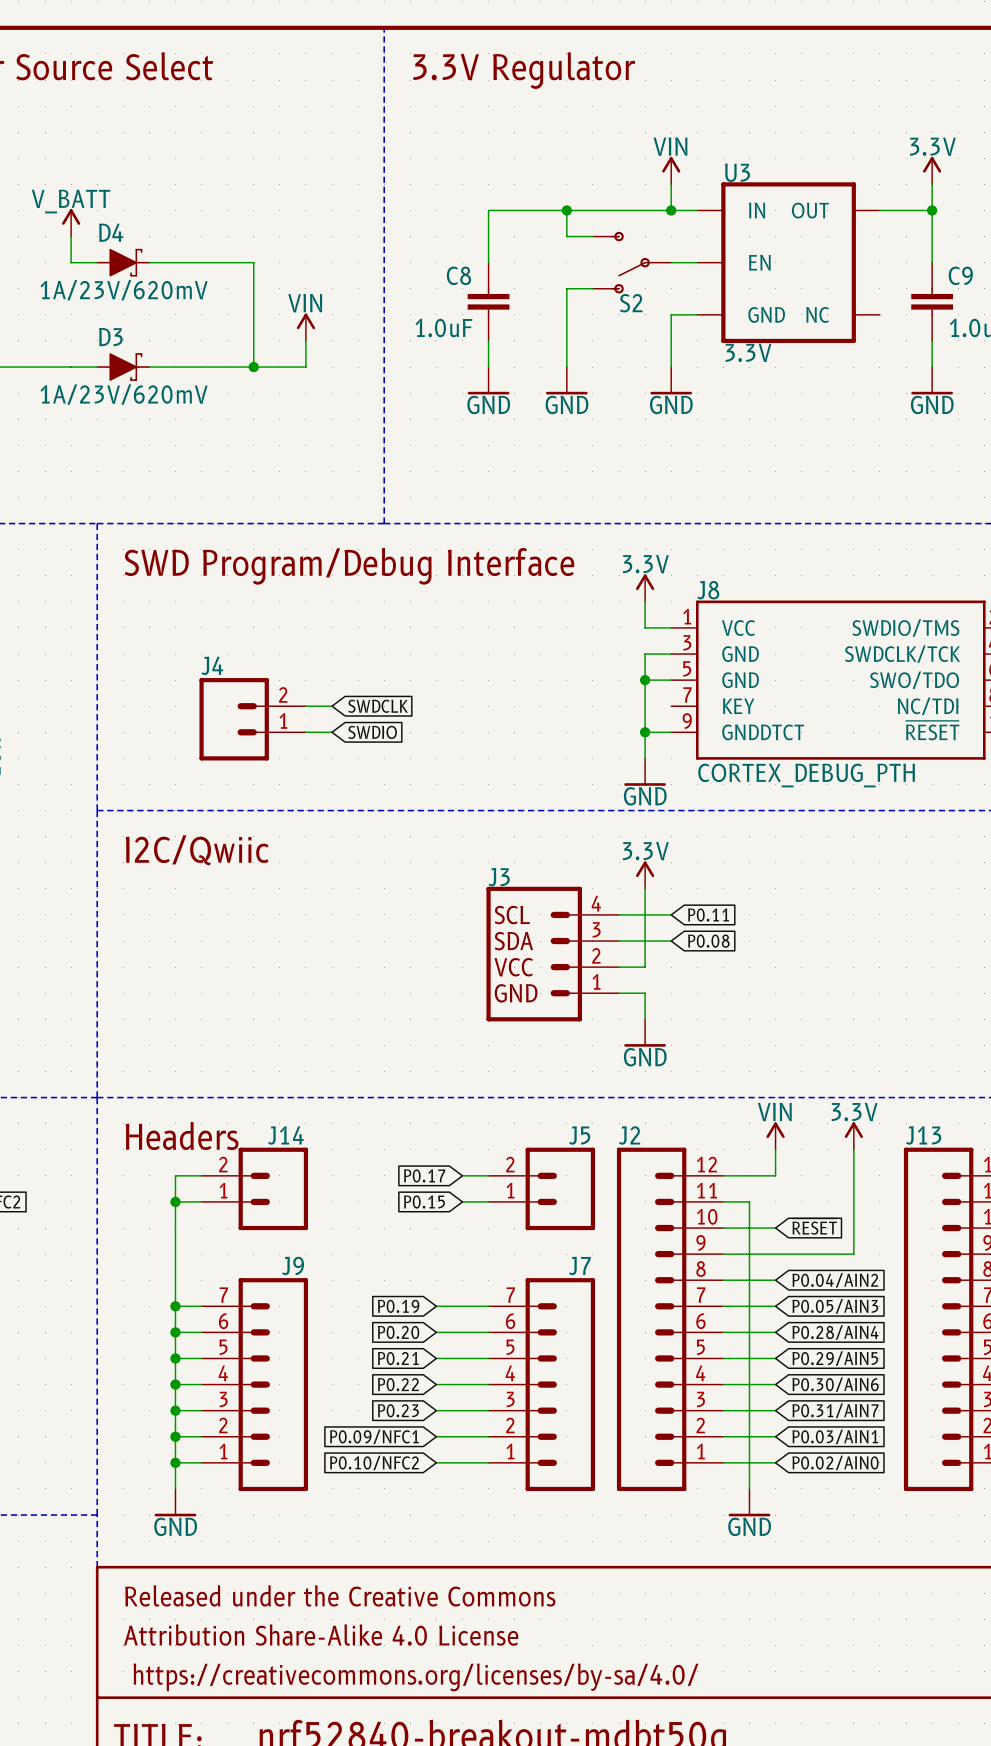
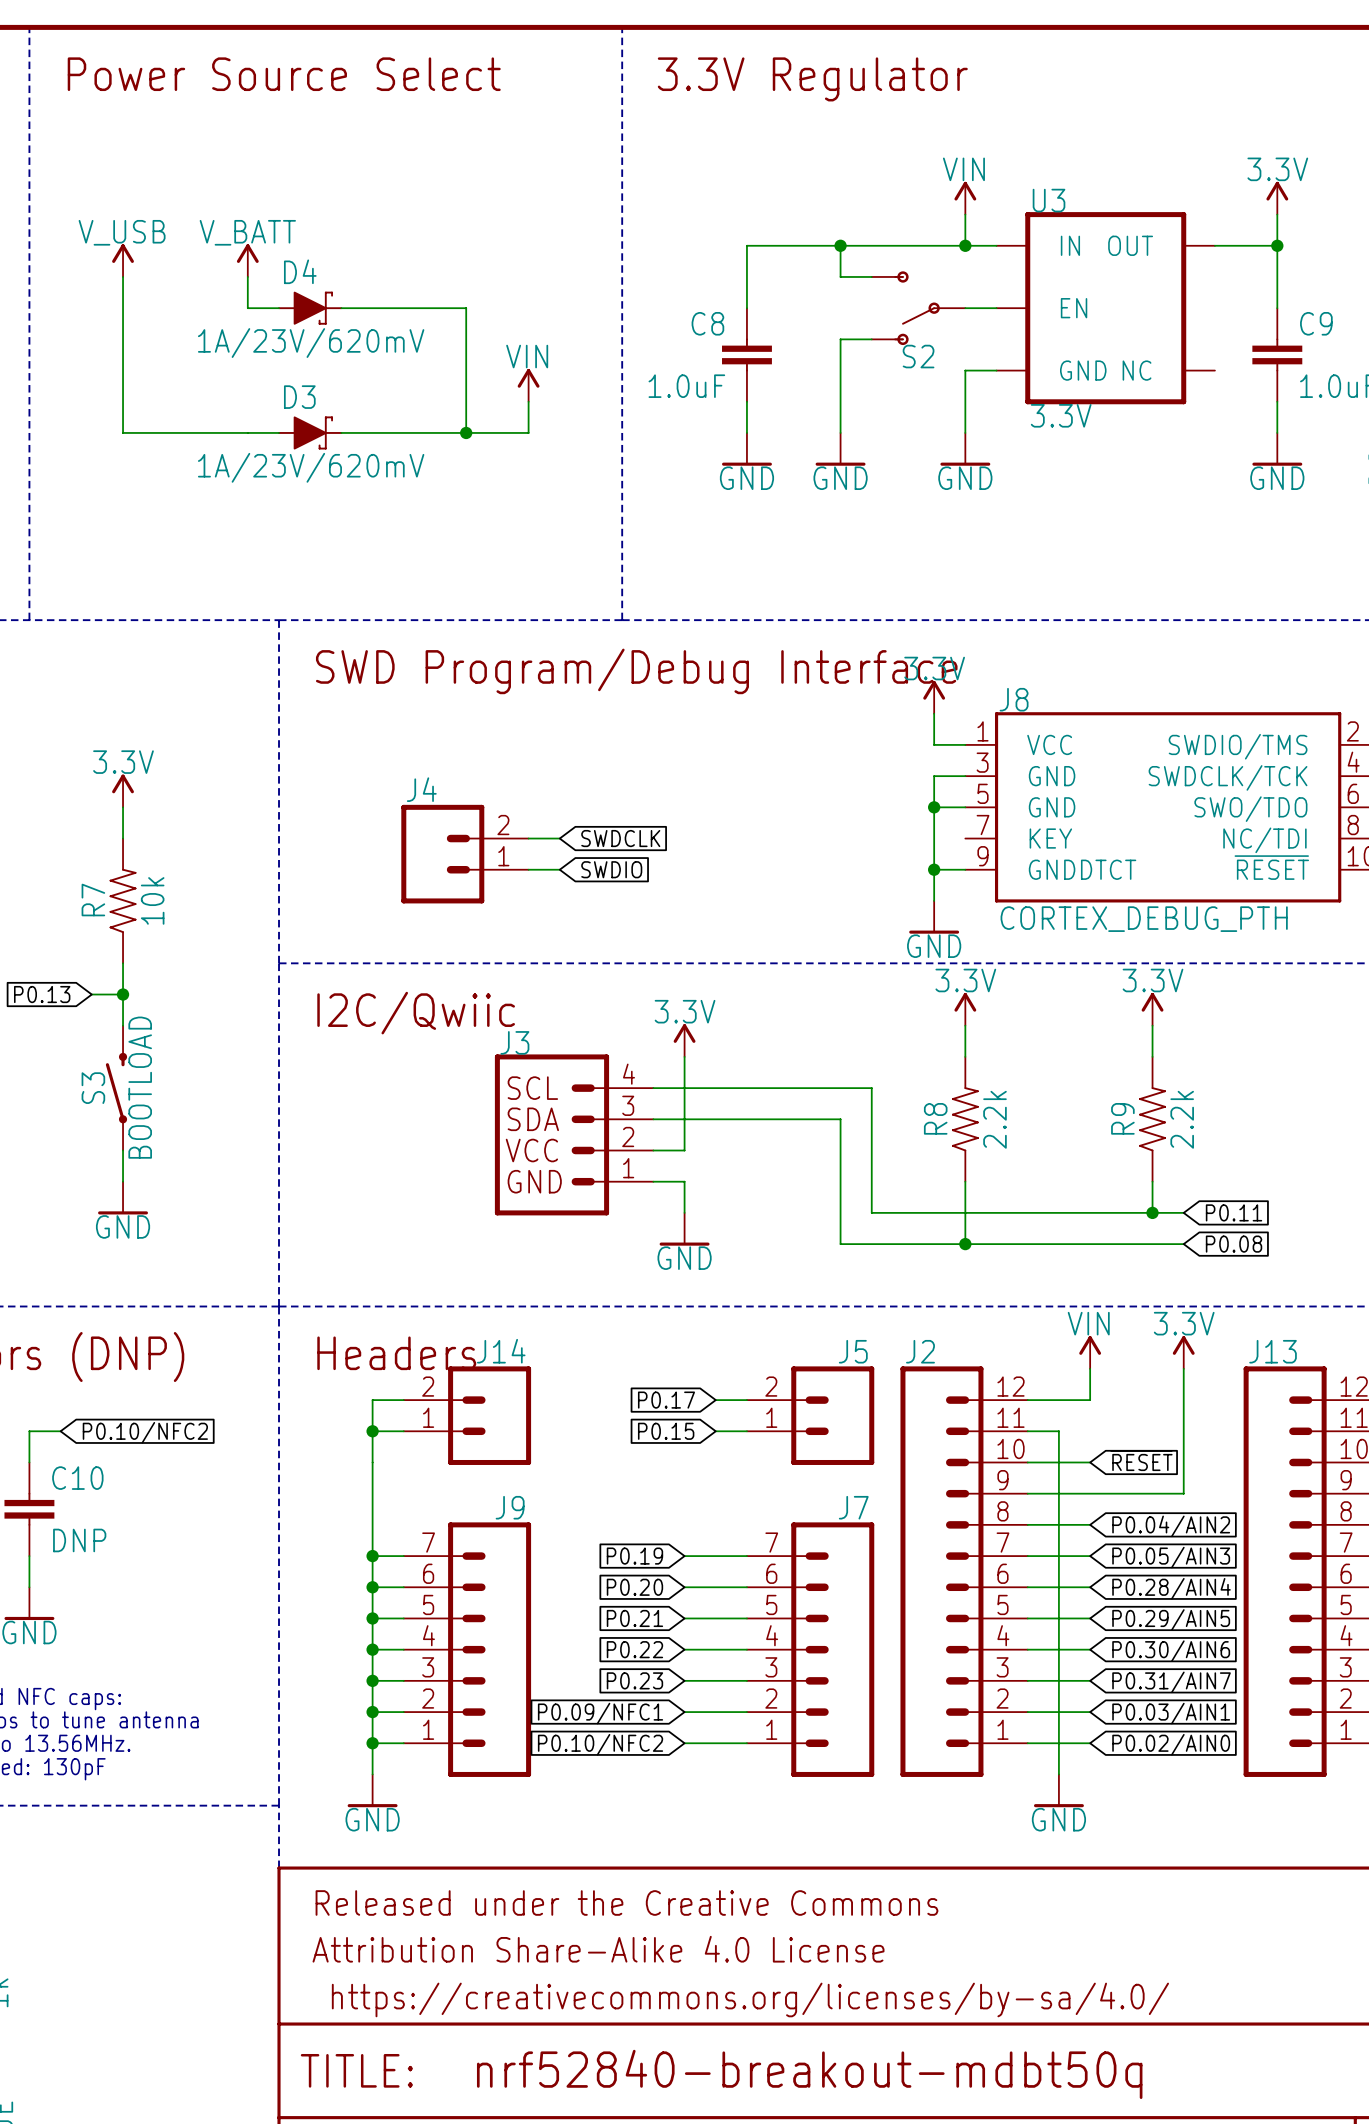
power symbol: none -> 3.3V (1152, 1009)
wire: none -> (965, 1025) (965, 1056)
wire: none -> (1152, 1025) (1152, 1056)
power symbol: none -> 3.3V (684, 1040)
power symbol position: 3.3V (645, 875) -> 3.3V (965, 1009)
wire: (645, 888) (645, 967) (619, 967) -> (684, 1056) (684, 1150) (653, 1150)
wire: none -> (653, 1088) (871, 1088) (871, 1212) (1183, 1212)
wire: (619, 914) (671, 914) -> none
global label position: P0.11 (708, 915) -> P0.11 (1234, 1212)
wire: none -> (653, 1119) (840, 1119) (840, 1244) (1183, 1244)
wire: (619, 941) (671, 941) -> none
R8: none -> 2.2k (965, 1119)
global label position: P0.08 (708, 941) -> P0.08 (1234, 1244)
R9: none -> 2.2k (1152, 1119)
J3 position: (552, 954) -> (574, 1134)
wire: (619, 993) (645, 993) (645, 1019) -> (653, 1181) (684, 1181) (684, 1212)
wire: none -> (965, 1181) (965, 1244)
wire: none -> (1152, 1181) (1152, 1212)
junction: none -> (1152, 1212)
power symbol position: GND (645, 1033) -> GND (684, 1229)
junction: none -> (965, 1244)

